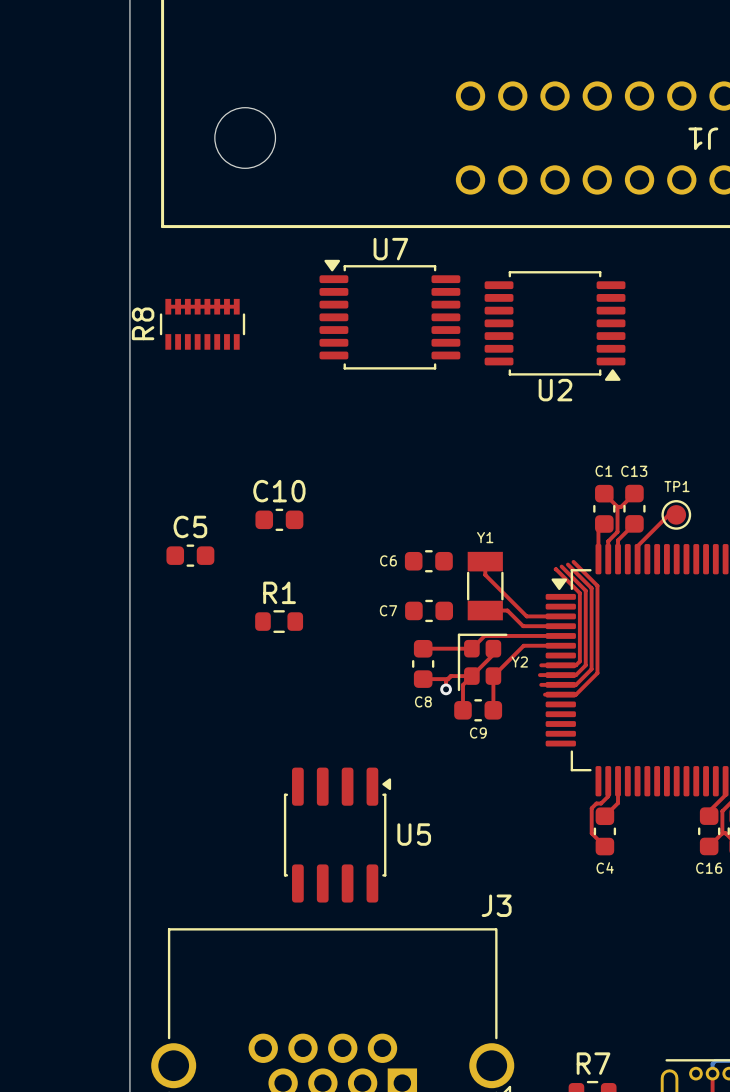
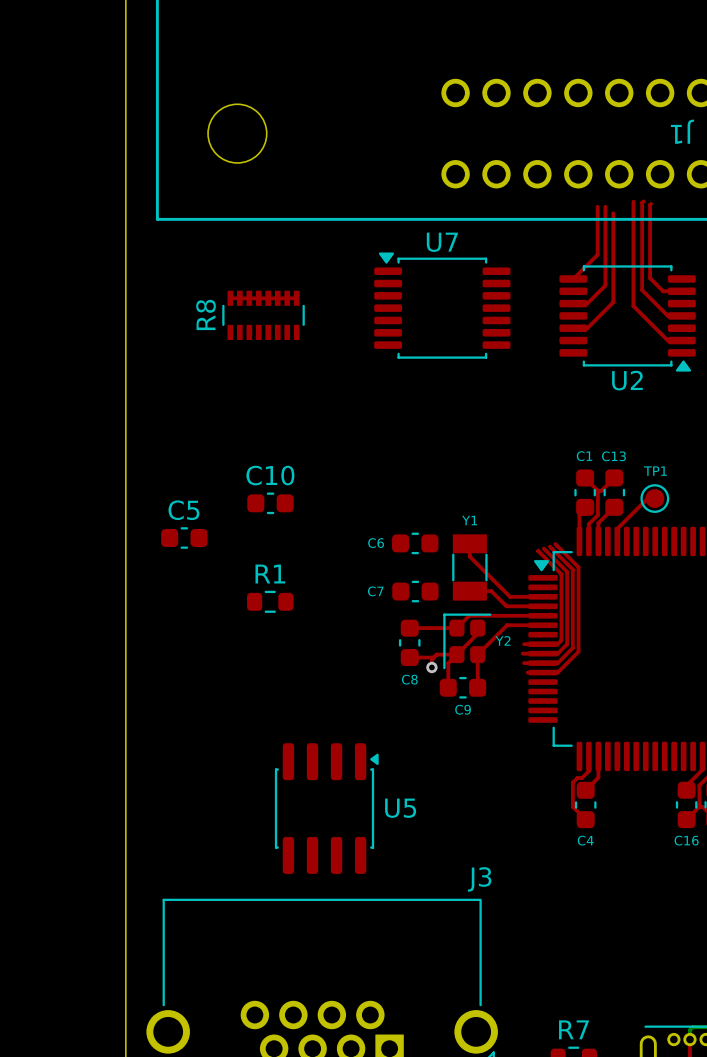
top track: none -> (643, 201) (642, 290) (667, 315) (681, 315)
top track: none -> (633, 201) (633, 306) (667, 340) (681, 340)
top track: none -> (651, 203) (650, 278) (663, 291) (681, 291)
top track: none -> (597, 206) (597, 254) (573, 278)
top track: none -> (605, 206) (605, 285) (587, 303) (573, 303)
top track: none -> (613, 213) (613, 302) (587, 328) (573, 328)
top track: (168, 306) (236, 306) -> (230, 298) (296, 298)
U7 position: (389, 314) -> (442, 305)
R8 position: (202, 324) -> (263, 315)
U2 position: (555, 325) -> (627, 318)

